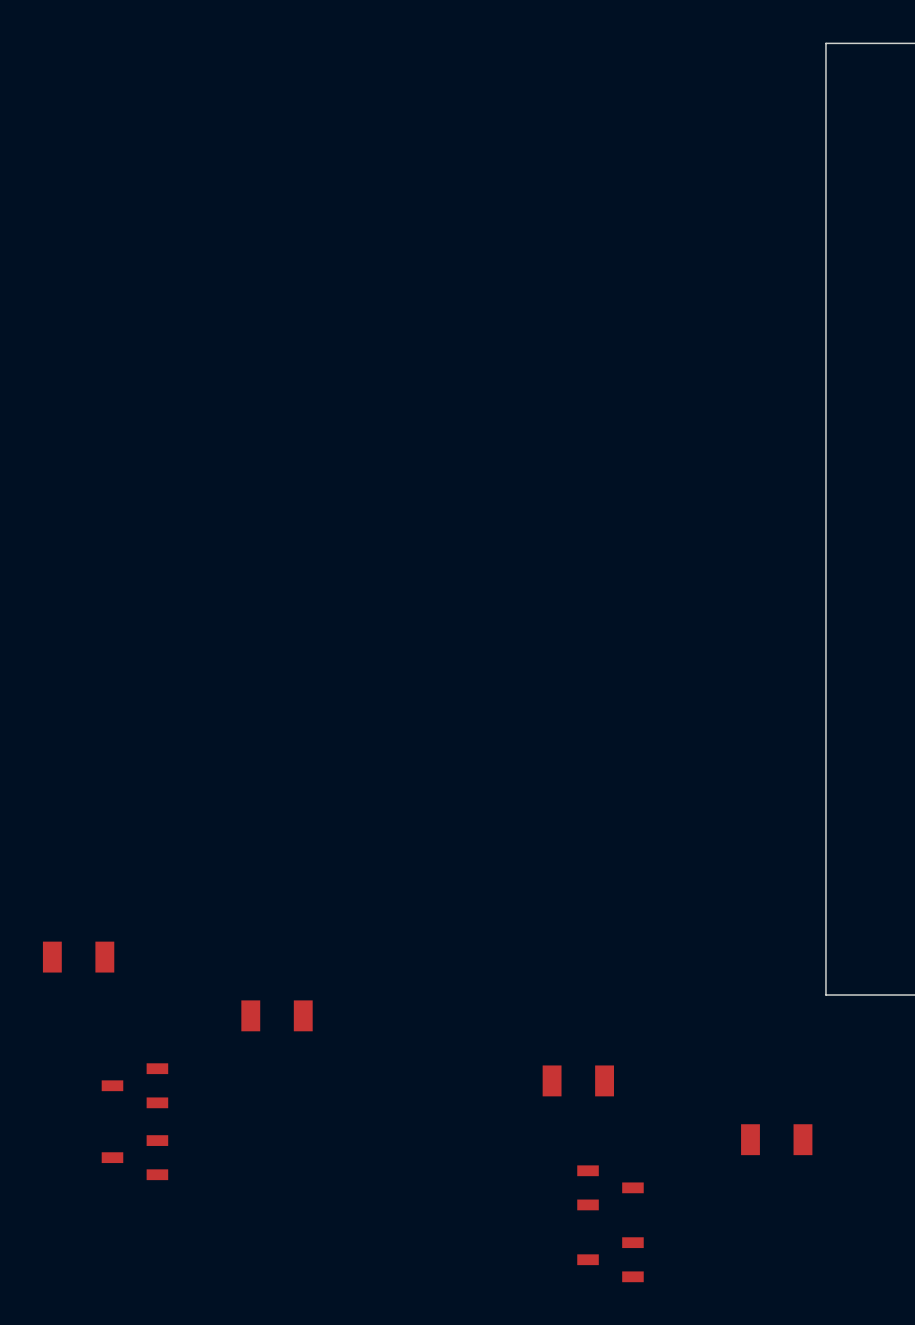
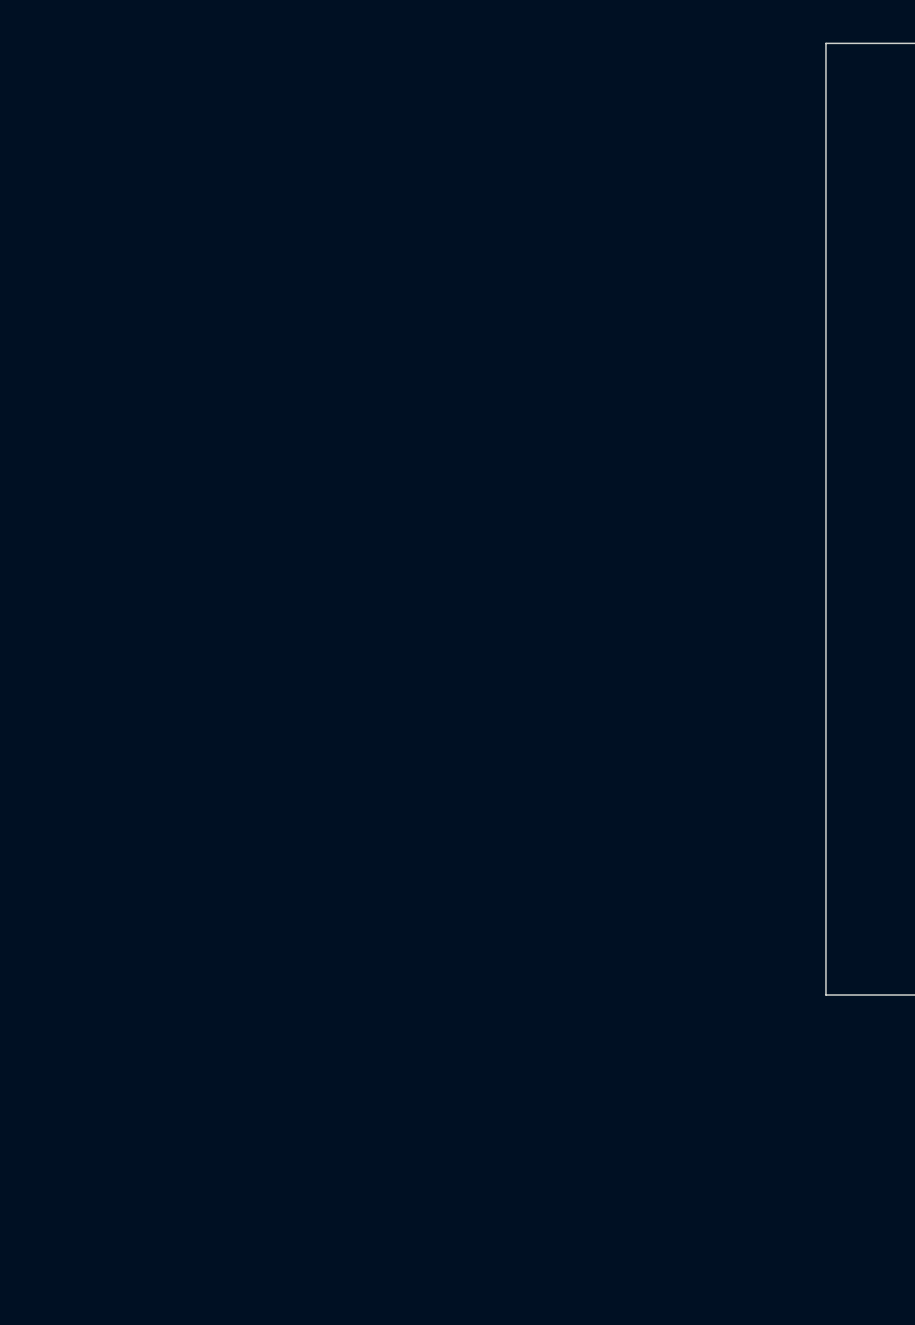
part: (78, 957) -> none
part: (277, 1015) -> none
part: (578, 1080) -> none
part: (134, 1085) -> none
part: (776, 1139) -> none
part: (134, 1157) -> none
part: (610, 1187) -> none
part: (610, 1259) -> none

